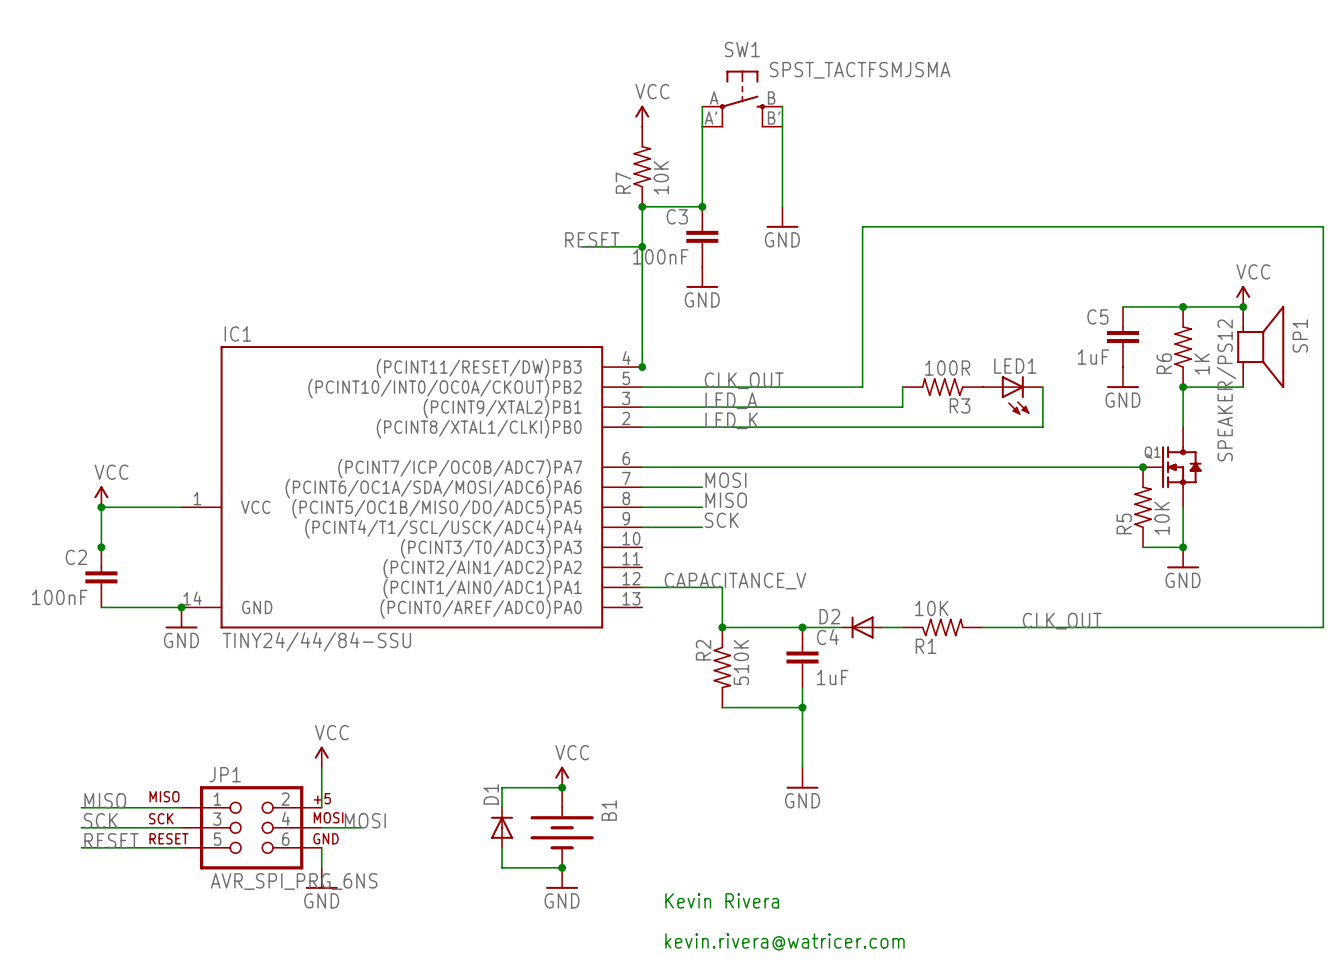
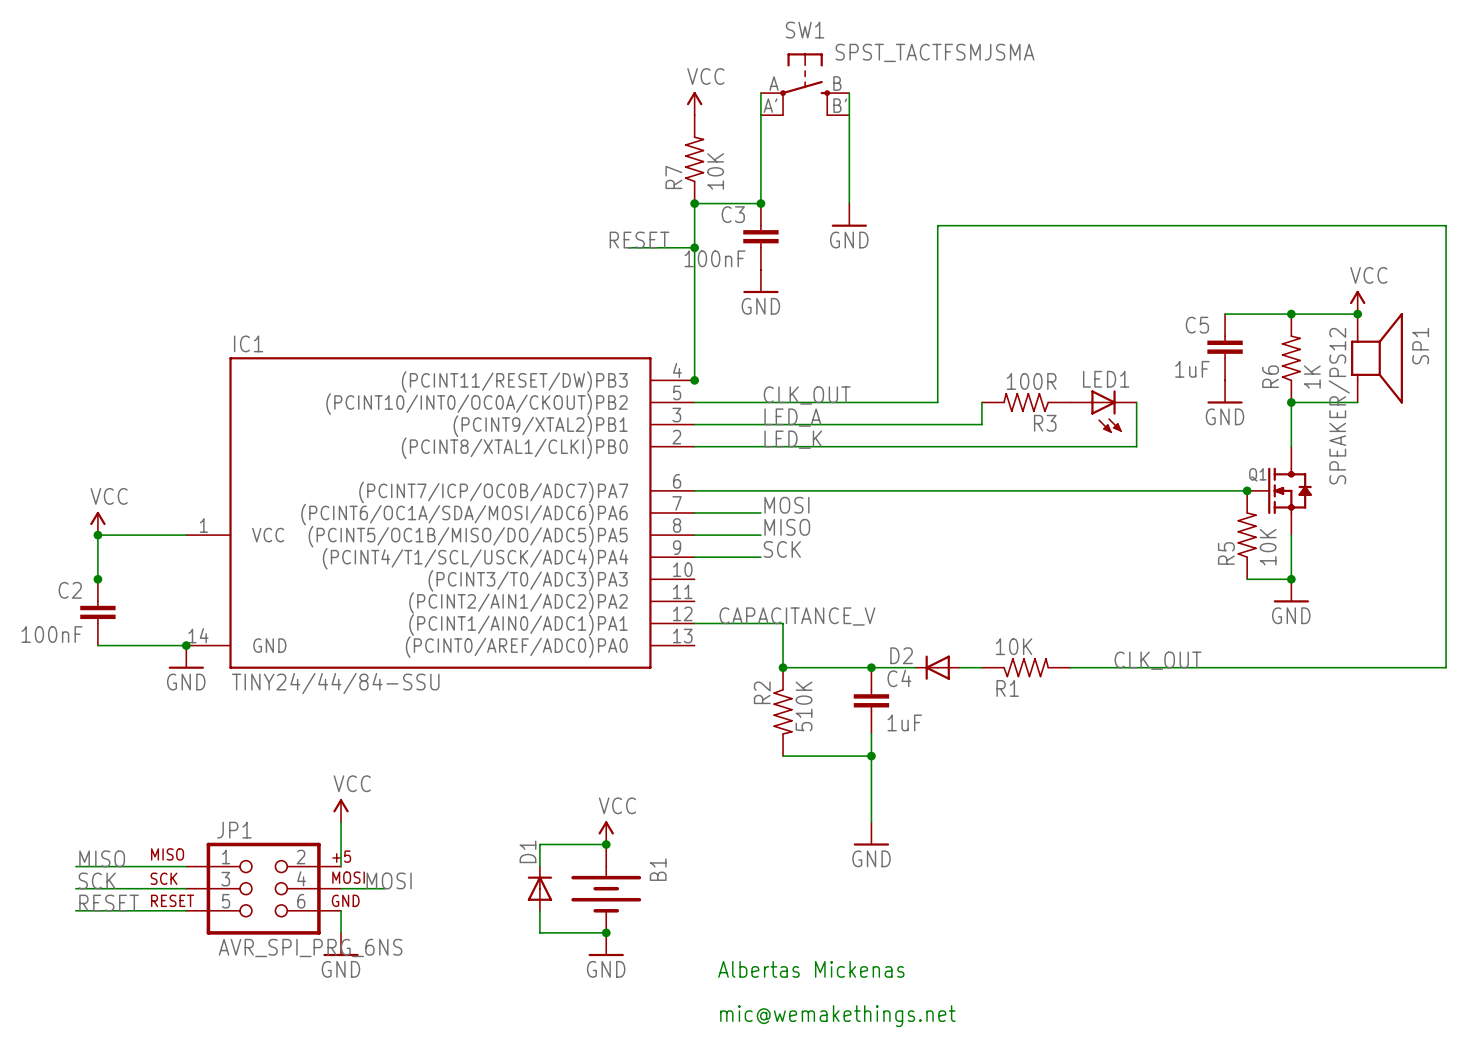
text: Kevin Rivera (722, 900) -> Albertas Mickenas (811, 969)
text: kevin.rivera@watricer.com (785, 941) -> mic@wemakethings.net (837, 1016)

